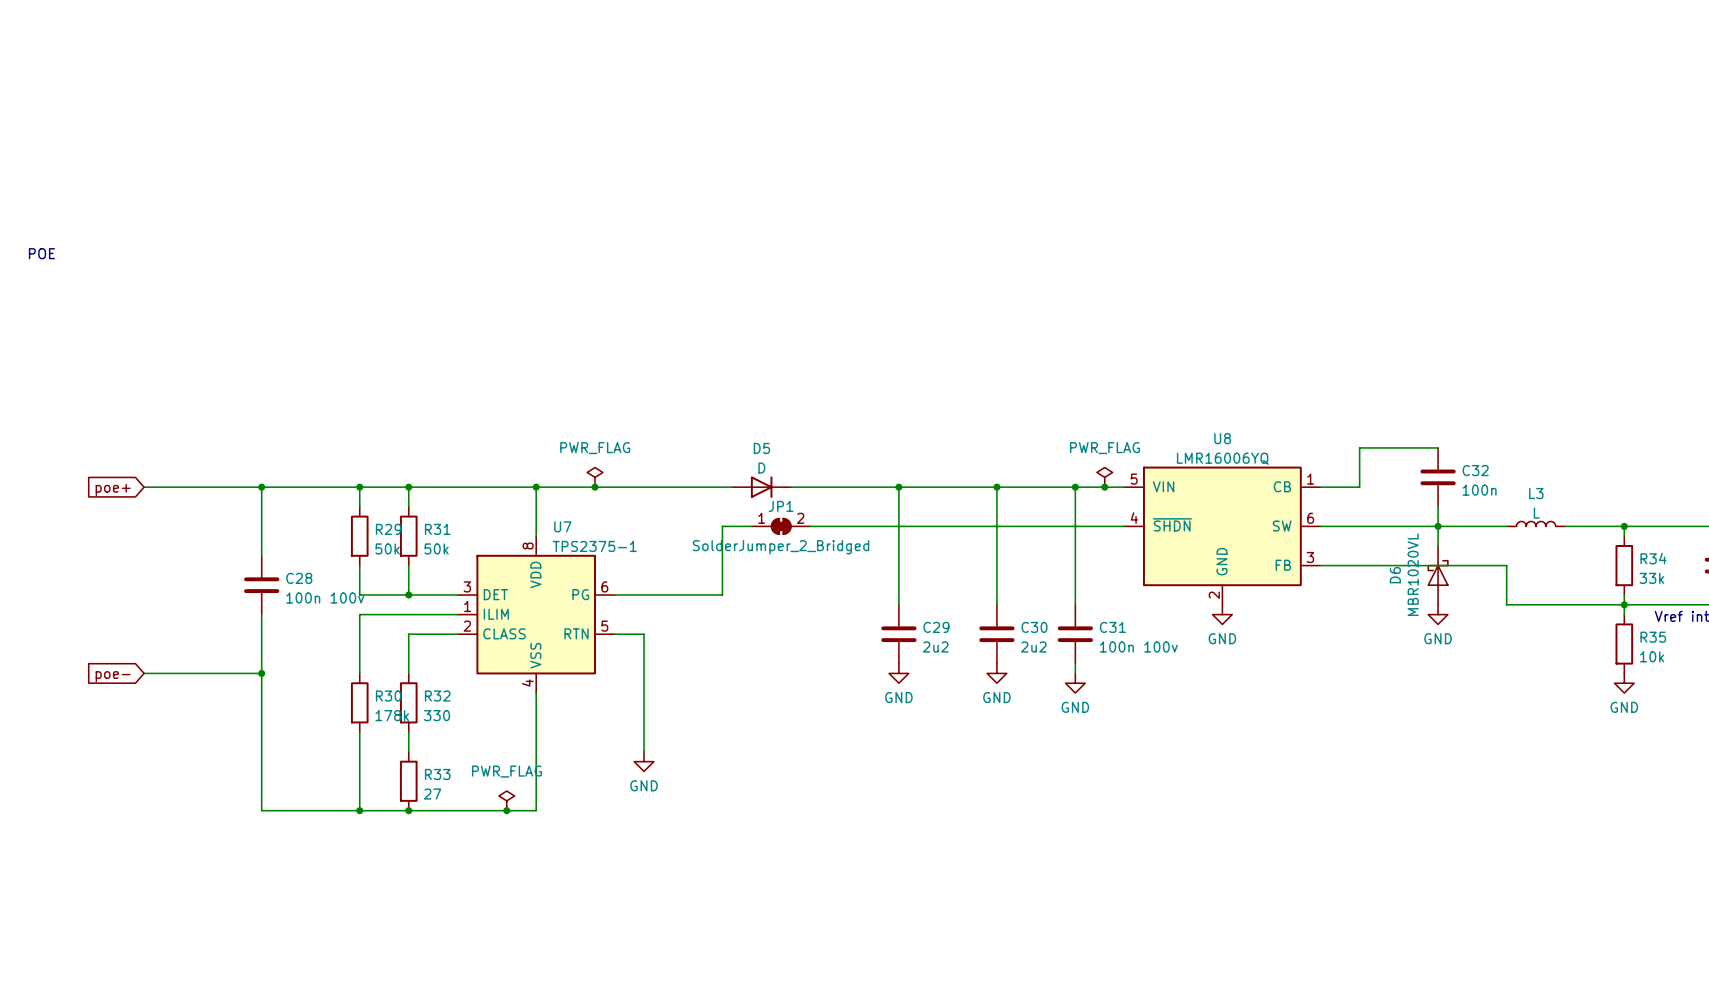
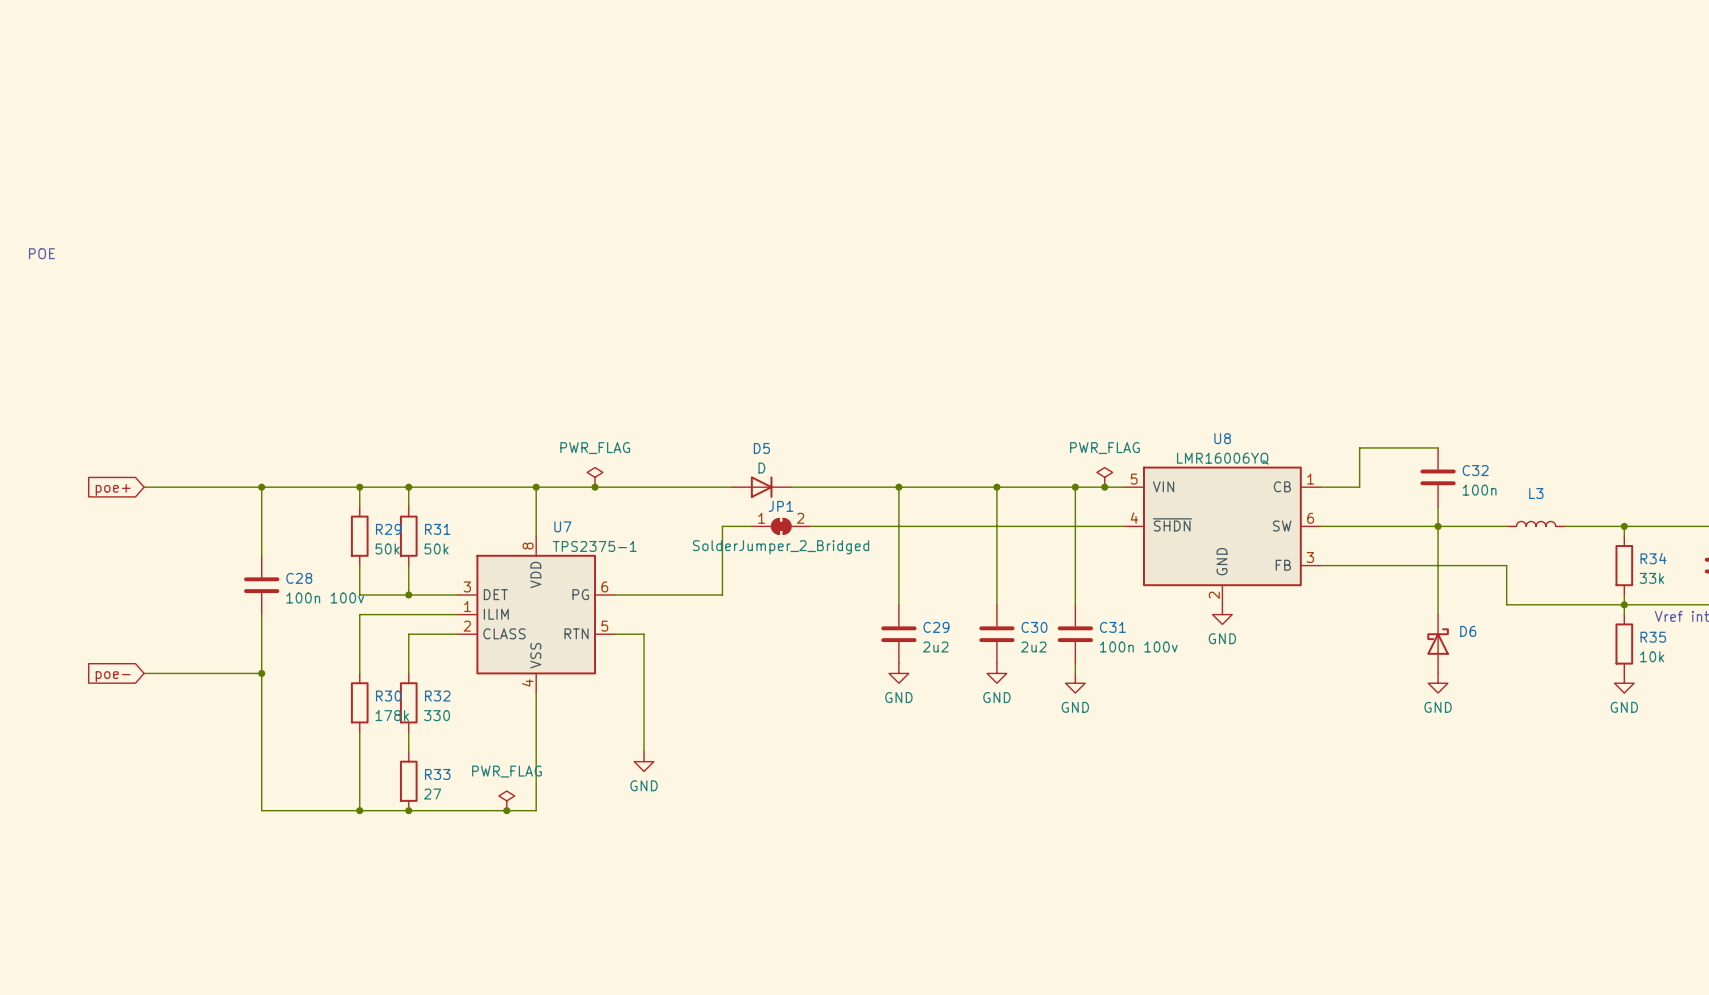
L3 value: L (1536, 513) -> none
D6 symbol: [1427, 545, 1449, 605] -> [1427, 614, 1449, 674]
D6 value: MBR1020VL (1413, 574) -> none
D6 name position: D6 (1395, 575) -> D6 (1468, 631)
power symbol position: GND (1438, 614) -> GND (1438, 683)

